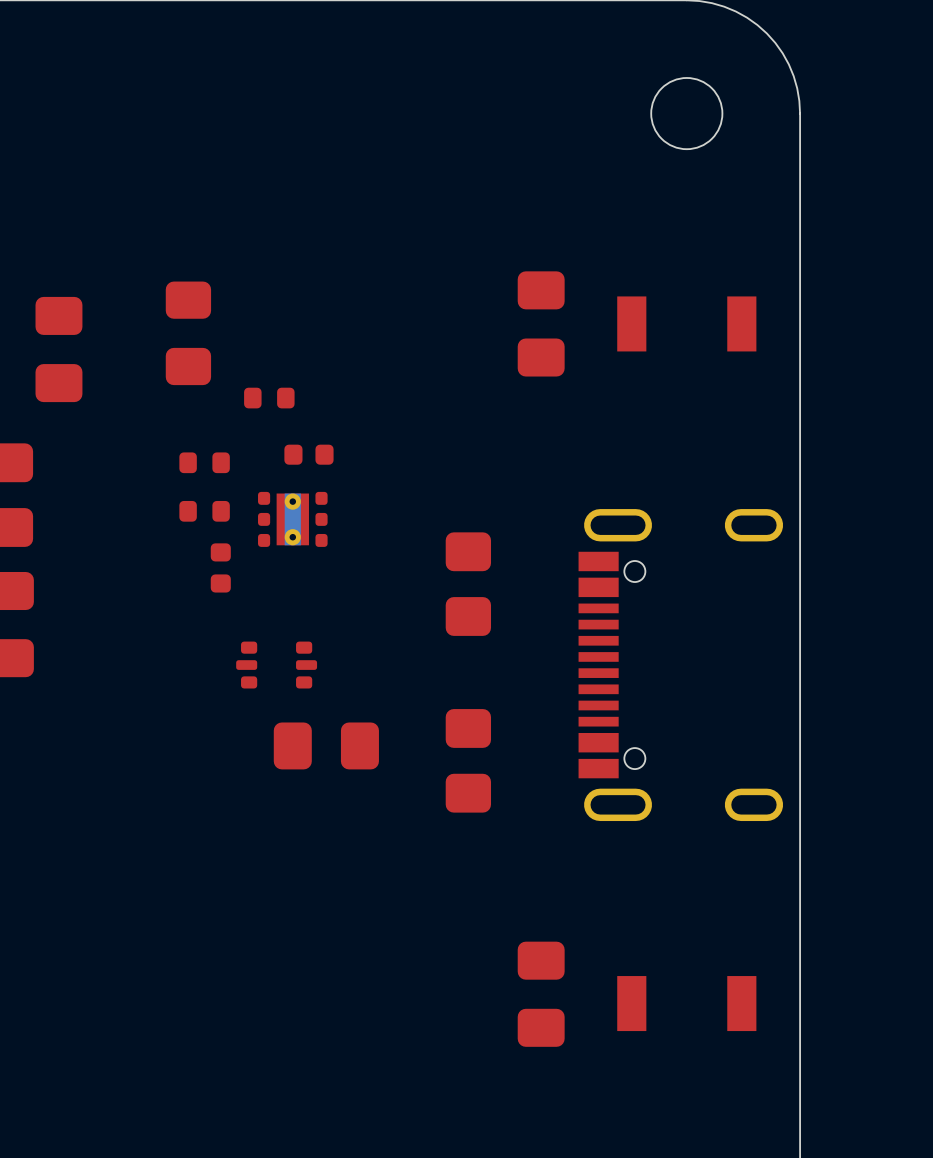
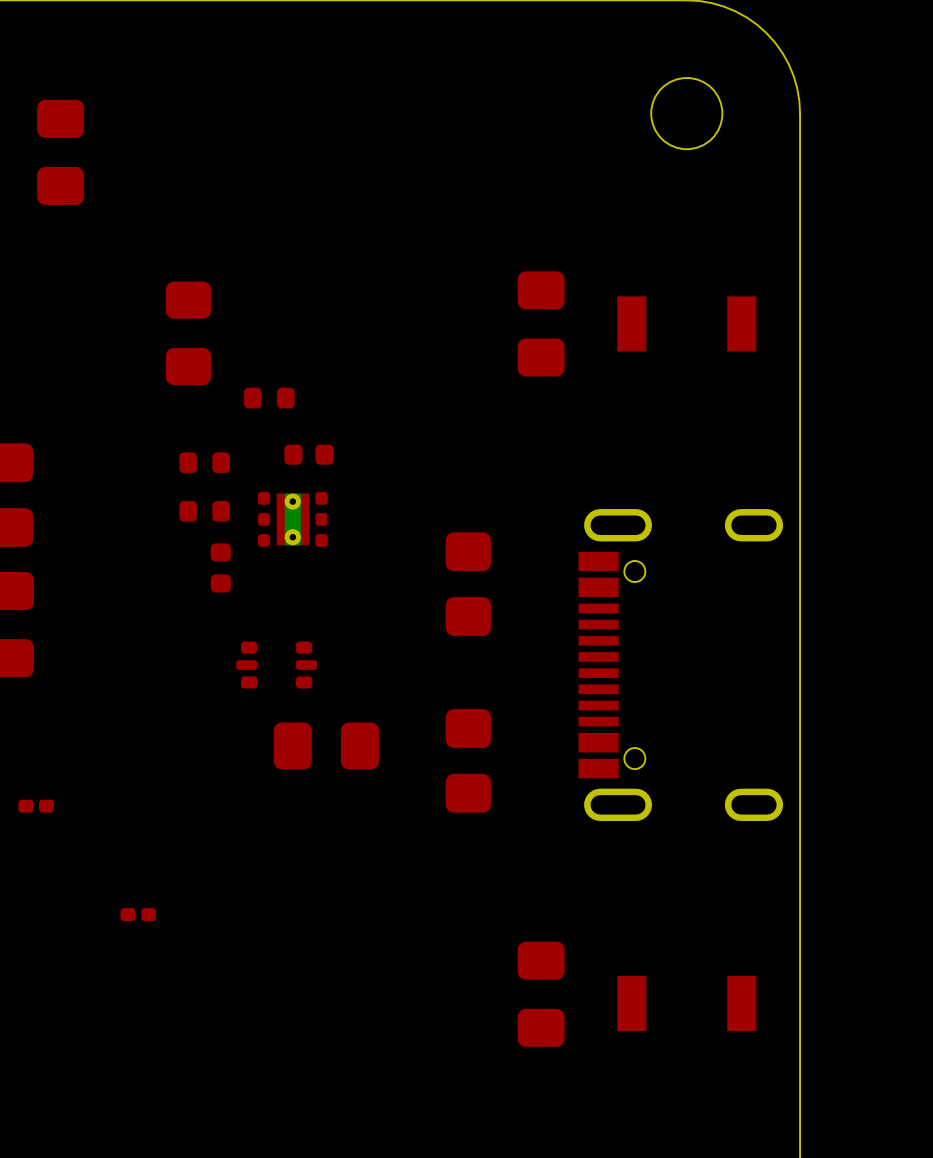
part: none -> (60, 152)
part: (58, 349) -> none
part: none -> (36, 806)
part: none -> (138, 914)

